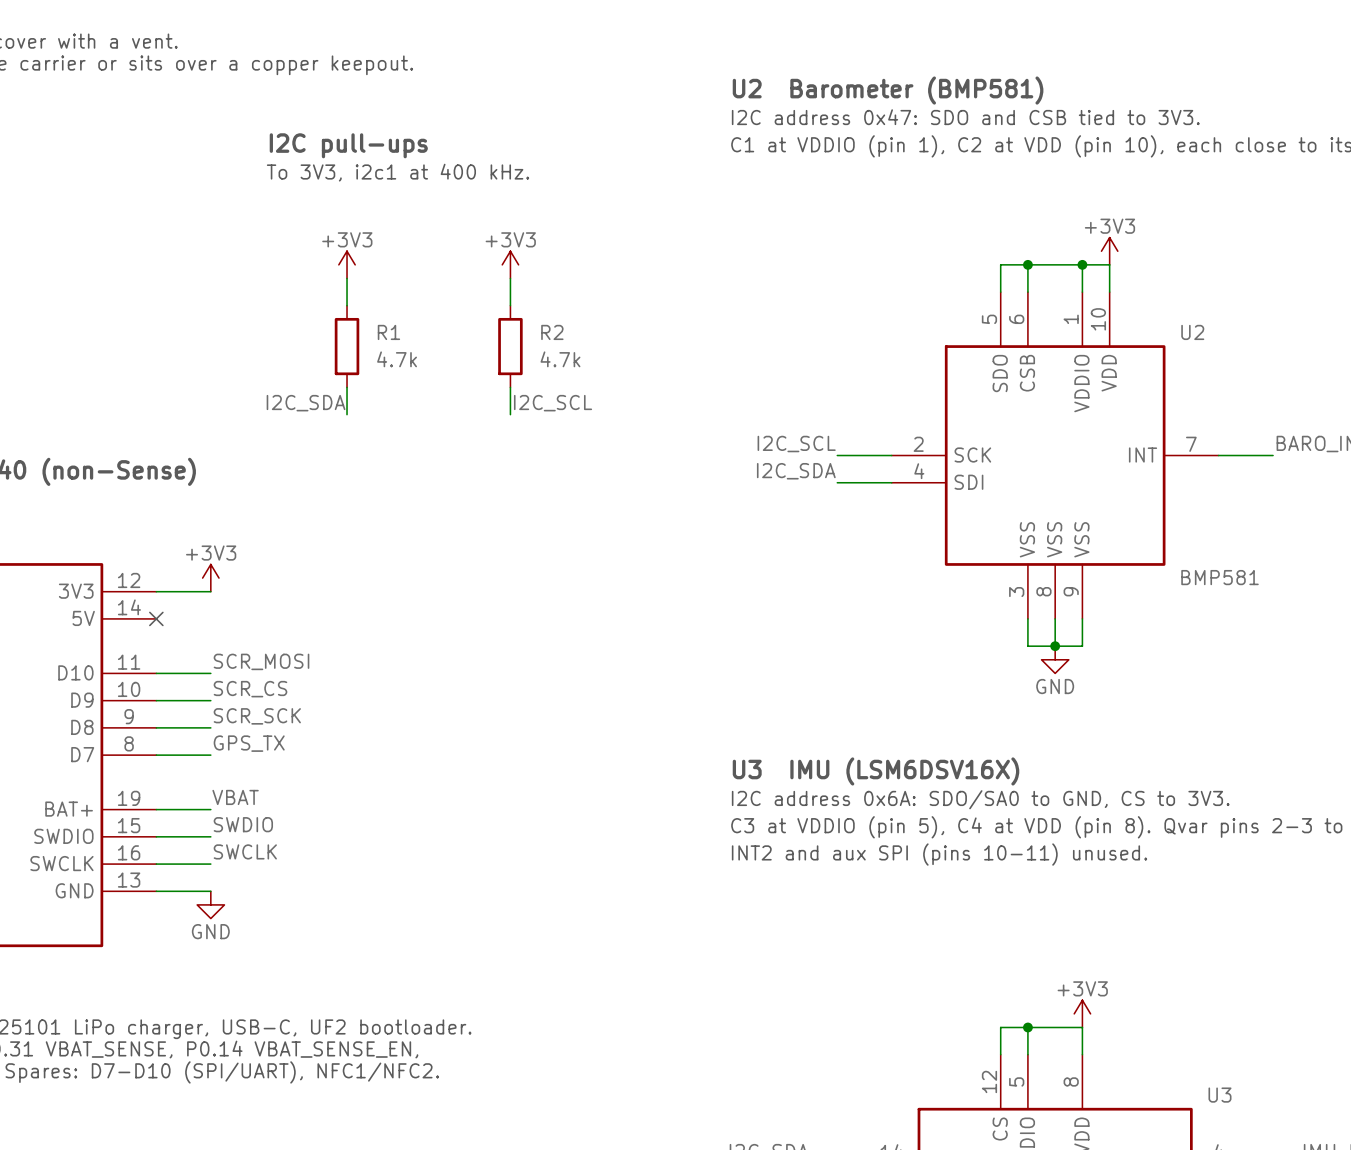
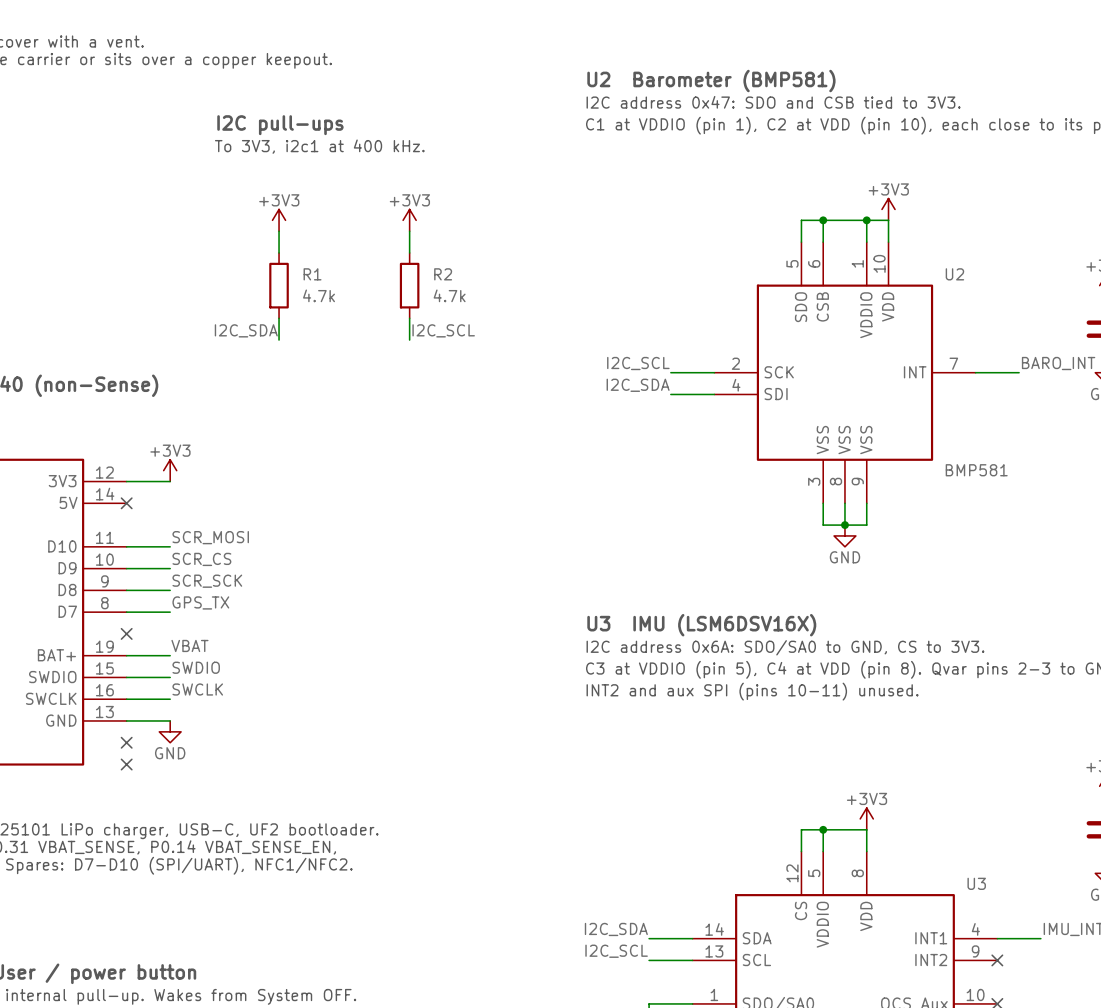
no-connect mark: none -> (126, 633)
no-connect mark: none -> (126, 742)
no-connect mark: none -> (126, 764)

